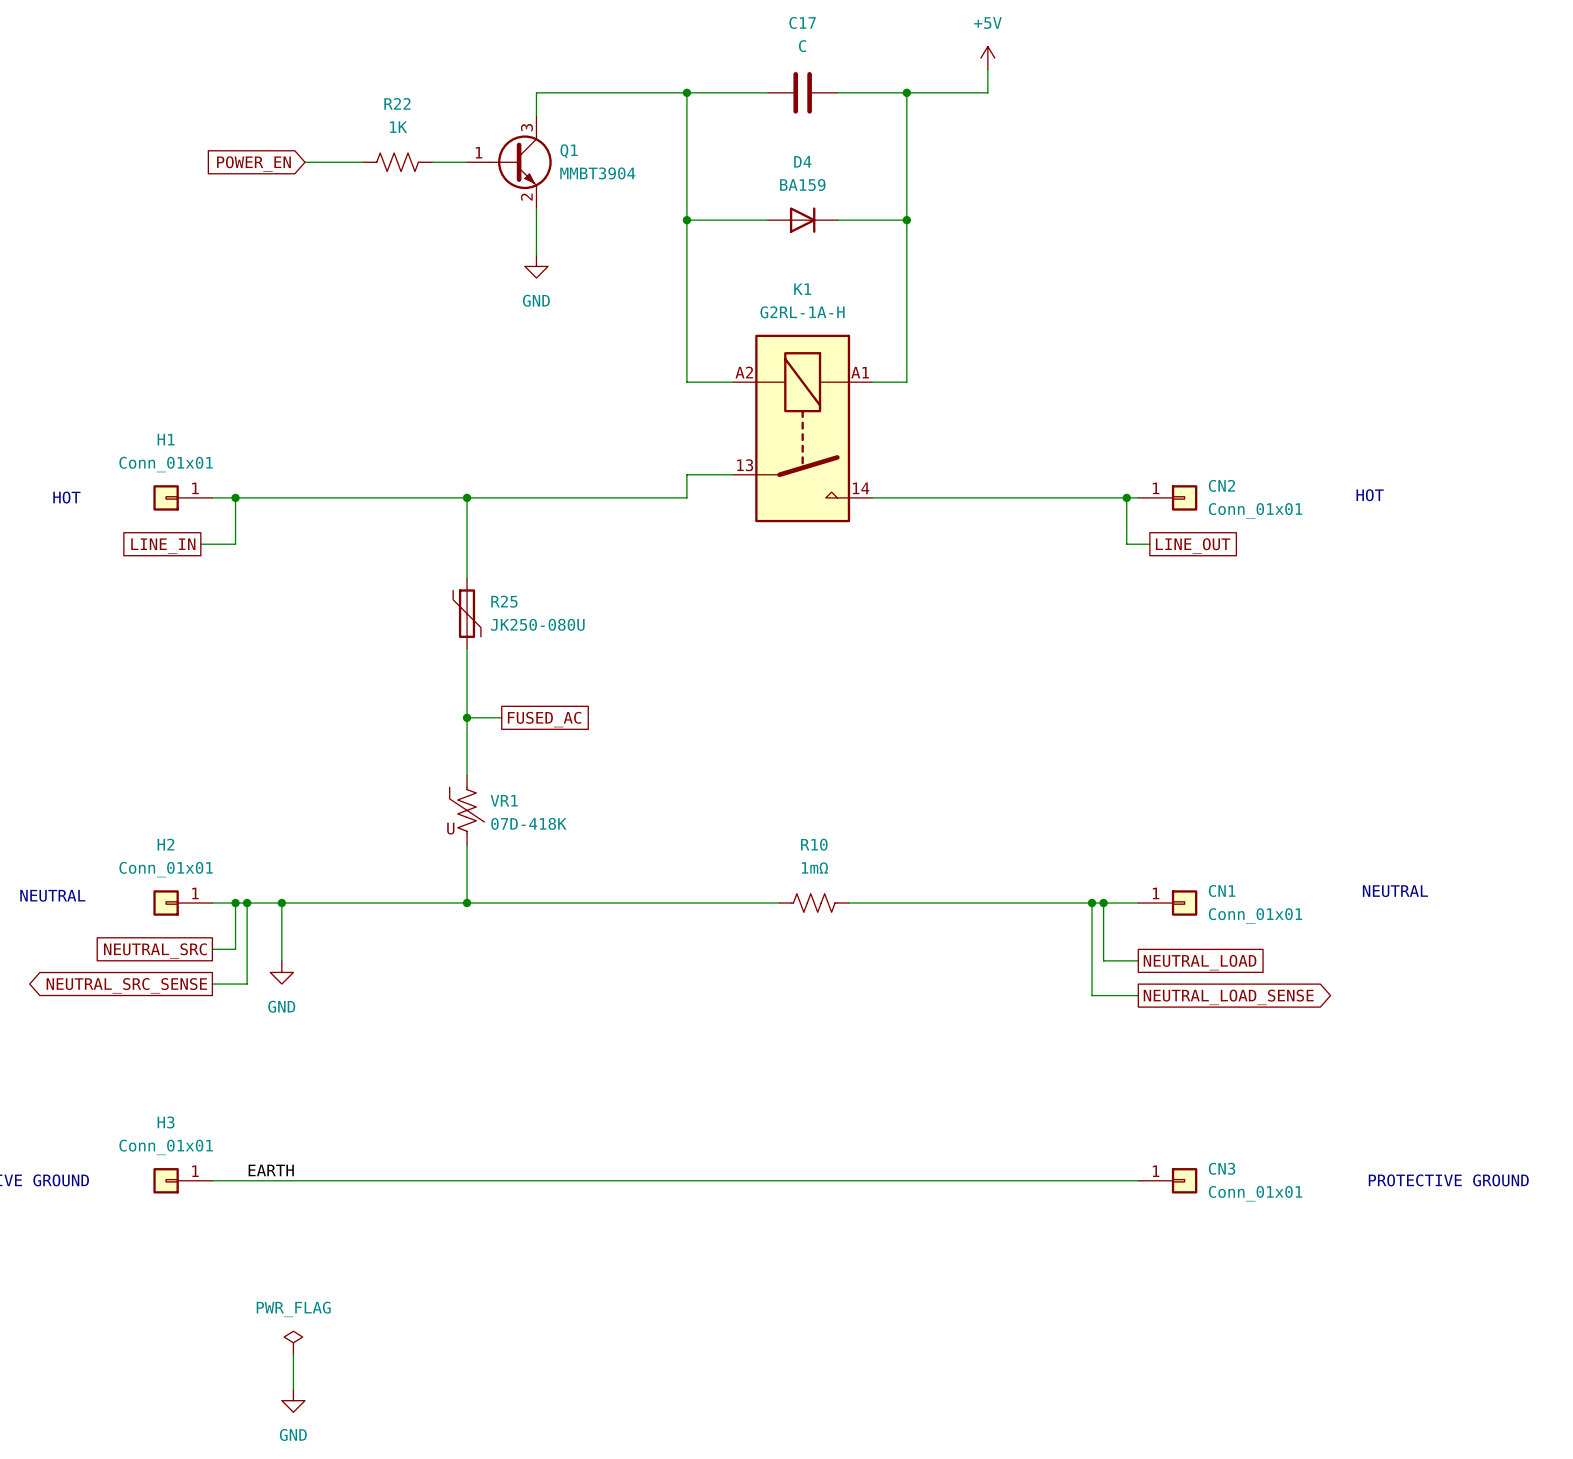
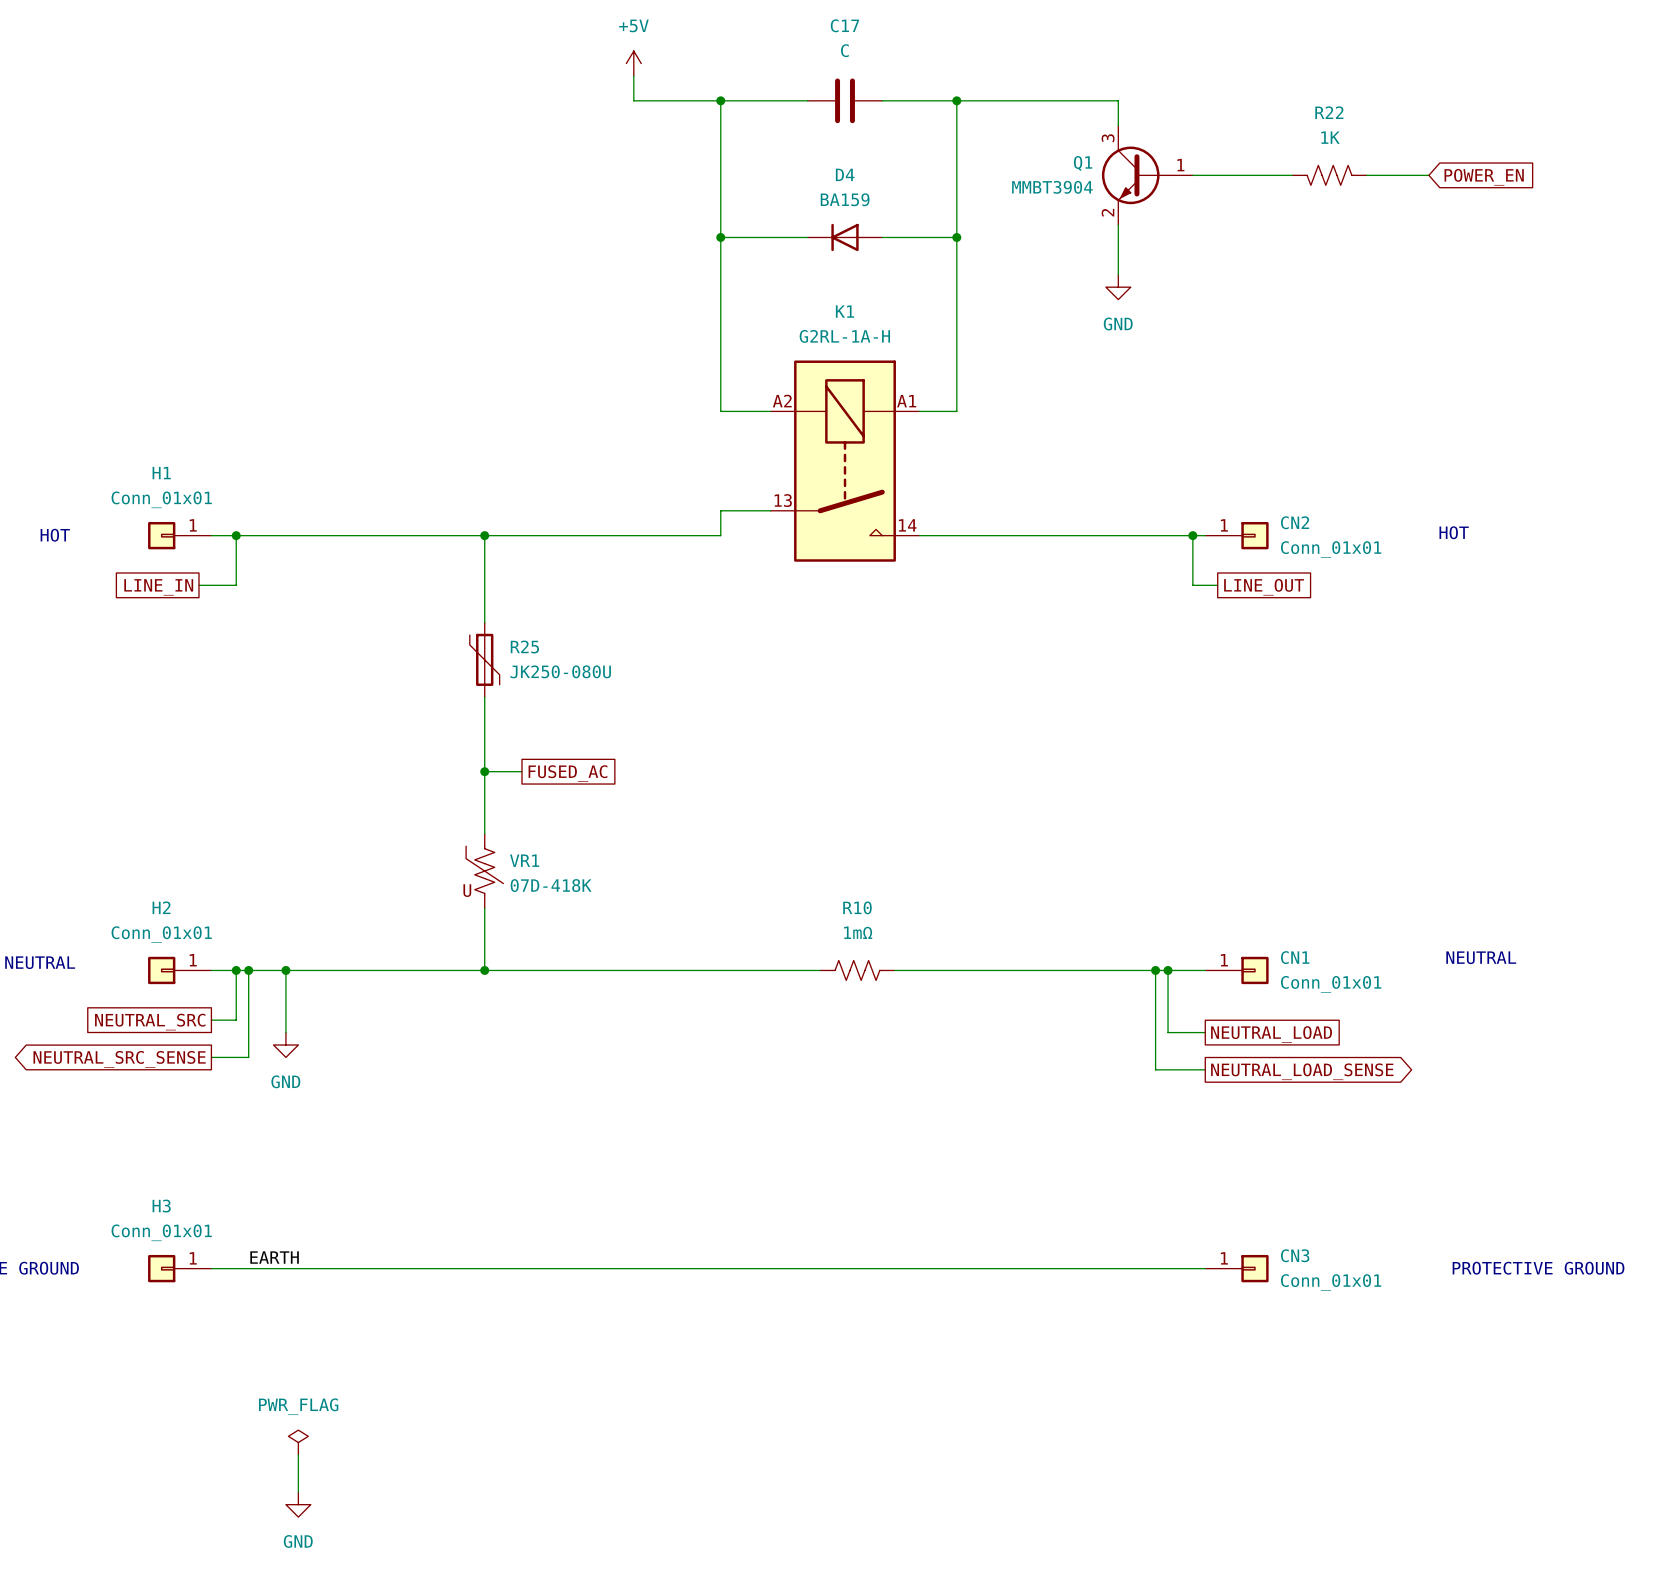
power symbol: none -> +5V (633, 63)
power symbol: +5V (987, 58) -> none
wire: (987, 69) (987, 92) -> (1118, 125) (1118, 100) (1043, 100)
wire: (605, 92) (536, 92) (536, 115) -> (633, 100) (633, 75)
wire: (304, 162) (362, 162) -> none
R22 flip: as is (397, 162) -> left-right (1329, 175)
R22 position: (397, 162) -> (1329, 175)
wire: (432, 162) (467, 162) -> none
Q1 position: (509, 162) -> (1147, 175)
Q1 flip: as is (520, 162) -> left-right (1134, 175)
wire: none -> (1192, 175) (1292, 175)
wire: none -> (1366, 175) (1428, 175)
global label: POWER_EN (253, 164) -> none
global label: none -> POWER_EN (1484, 177)
wire: (536, 208) (536, 254) -> none
wire: none -> (1118, 225) (1118, 274)
D4 rotation: 0° (802, 220) -> 180° (845, 237)
power symbol: GND (536, 266) -> none
power symbol: none -> GND (1118, 287)

